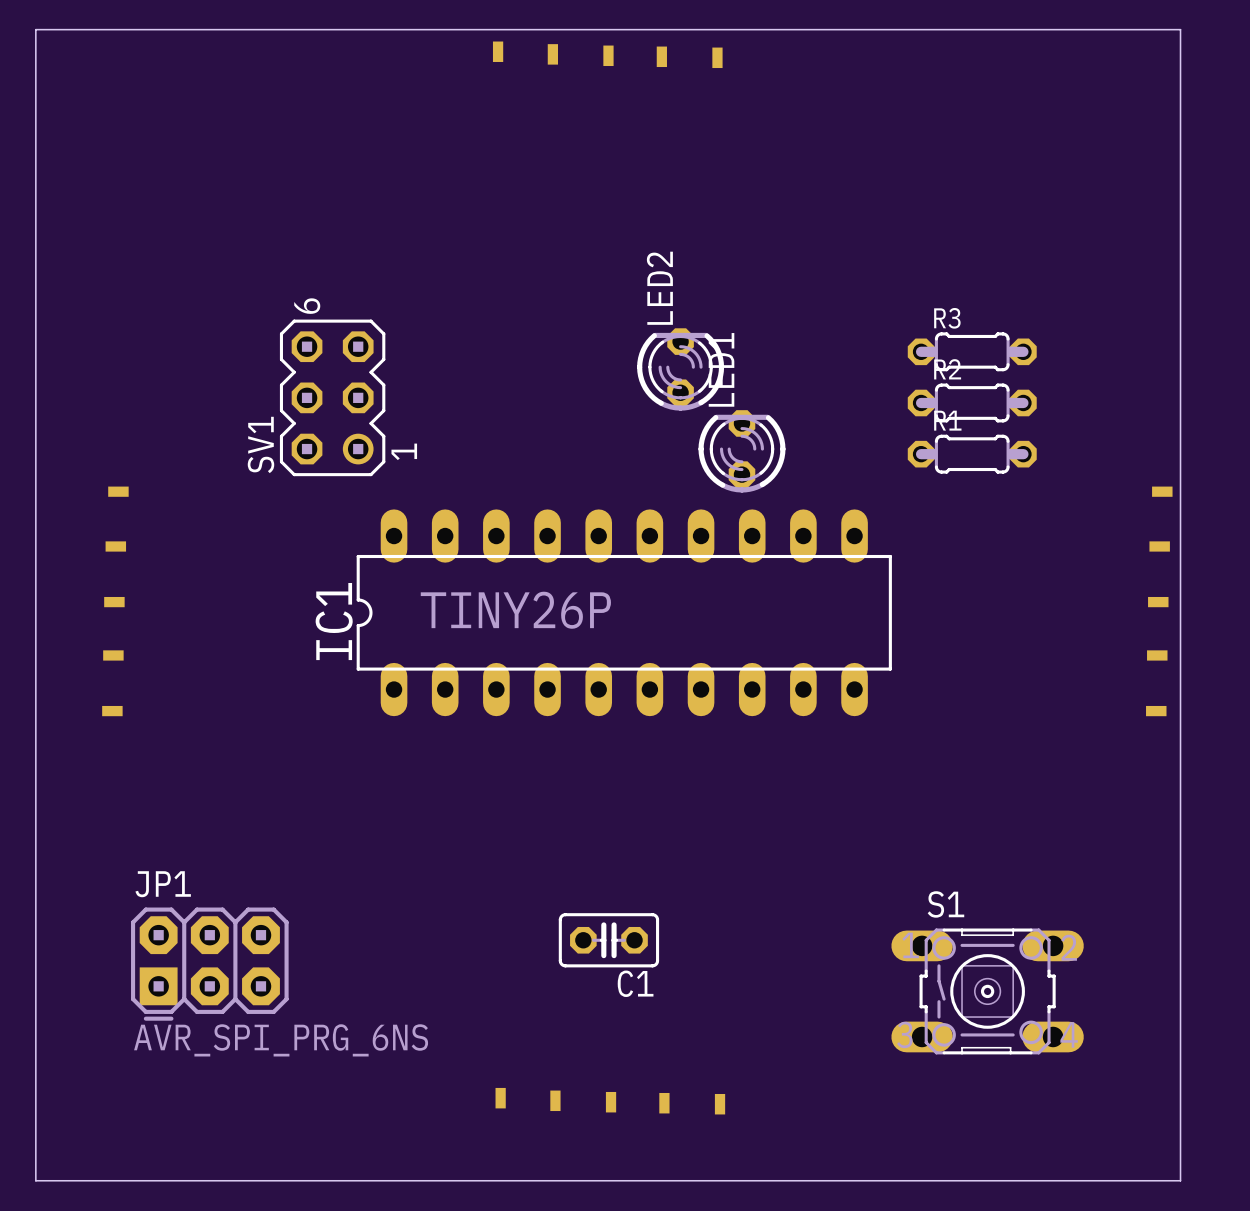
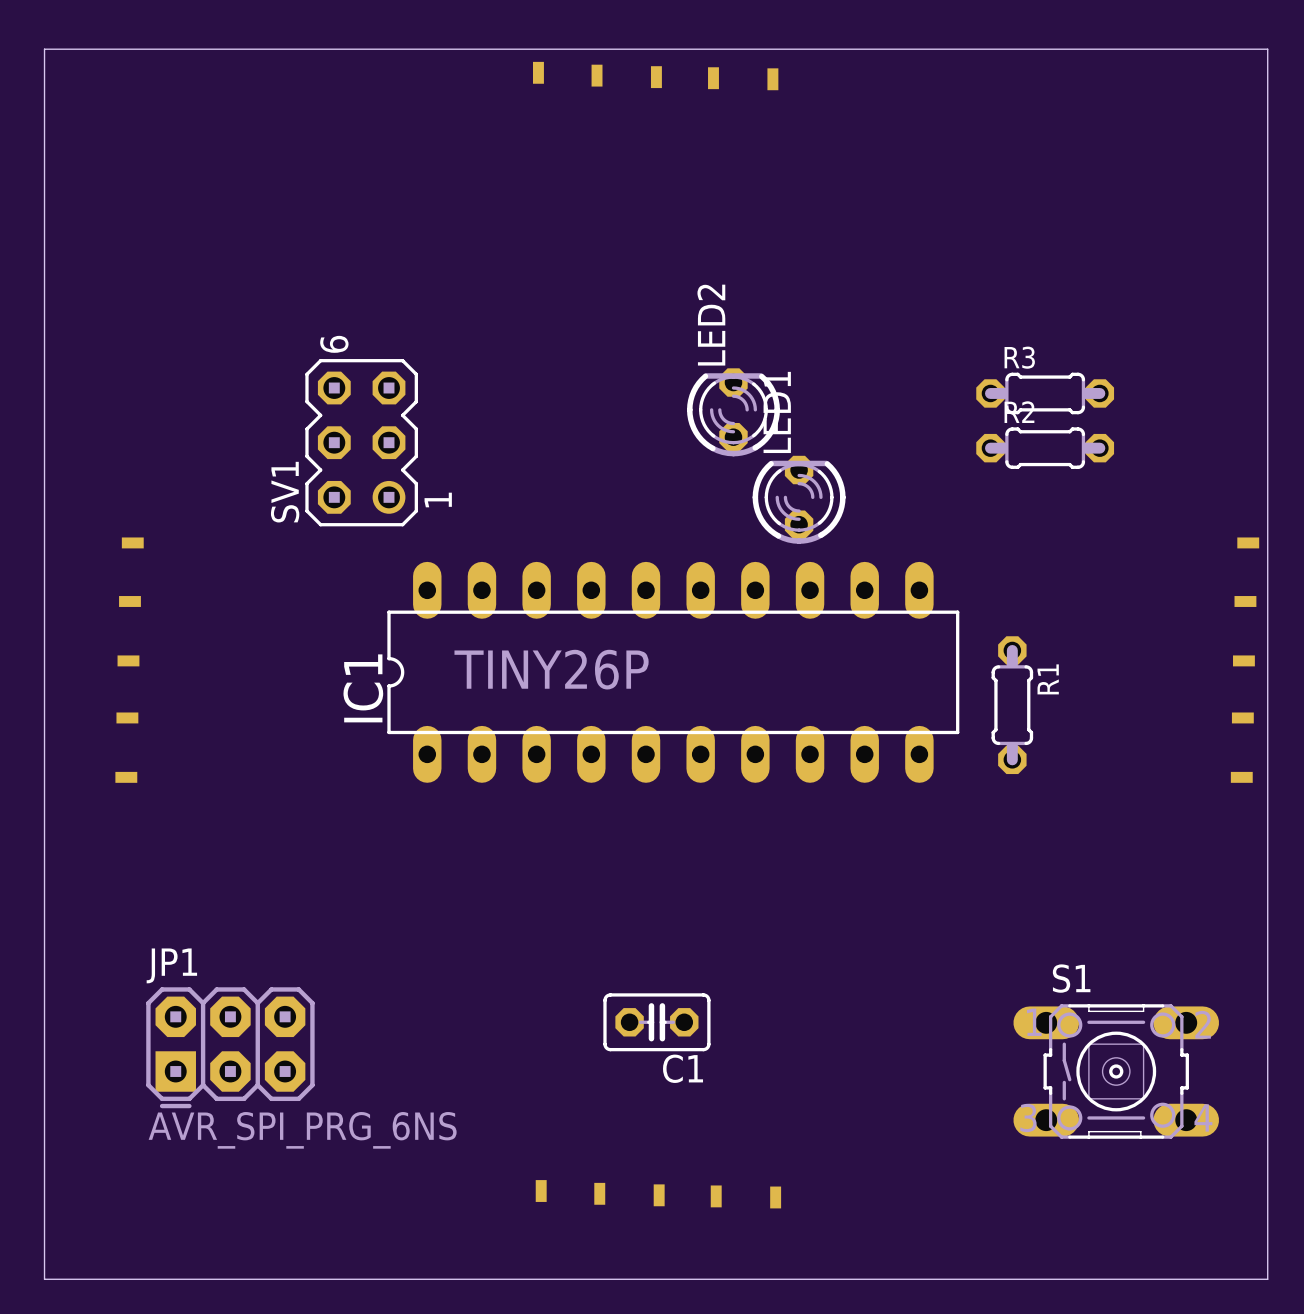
R1 rotation: 0° (972, 454) -> 90° clockwise (1012, 705)
R1 position: (972, 454) -> (1012, 705)
S1 position: (987, 991) -> (1116, 1071)

